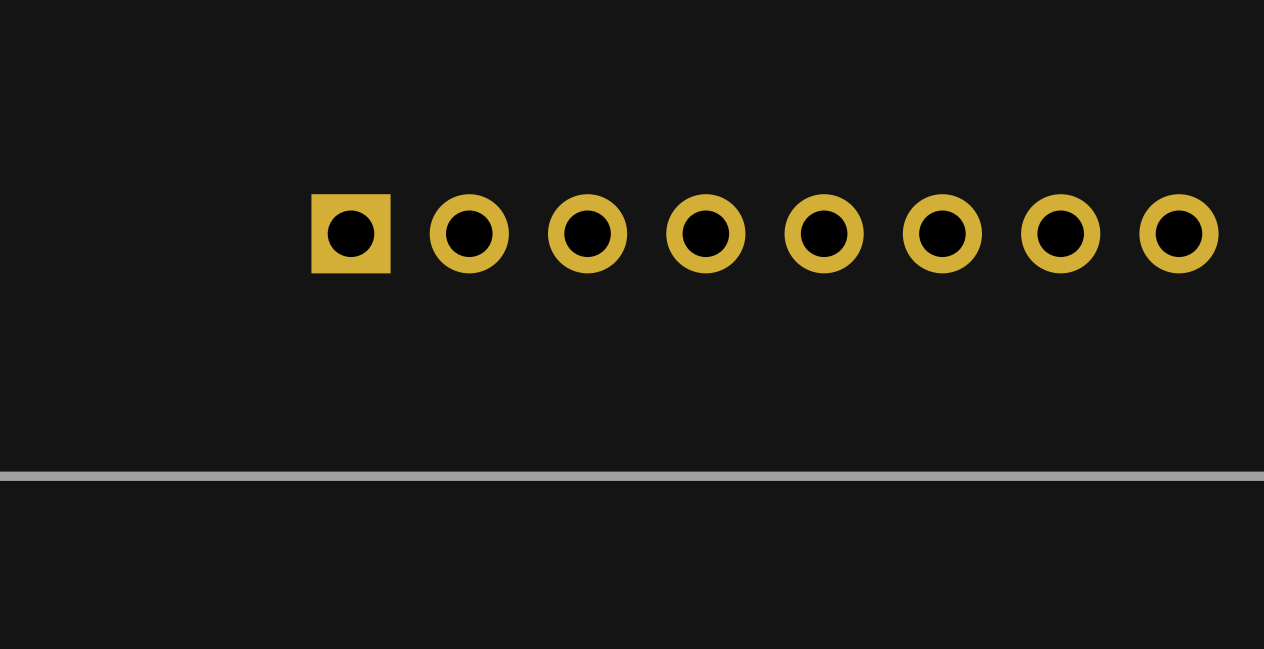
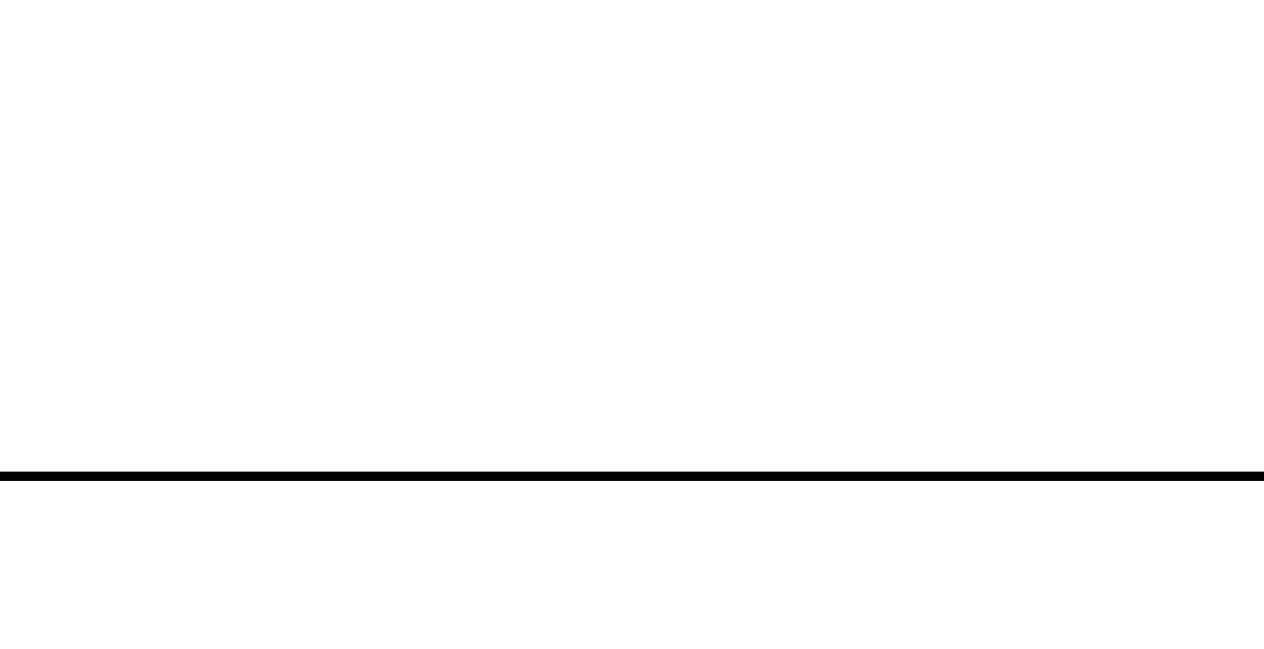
part: (765, 233) -> none

